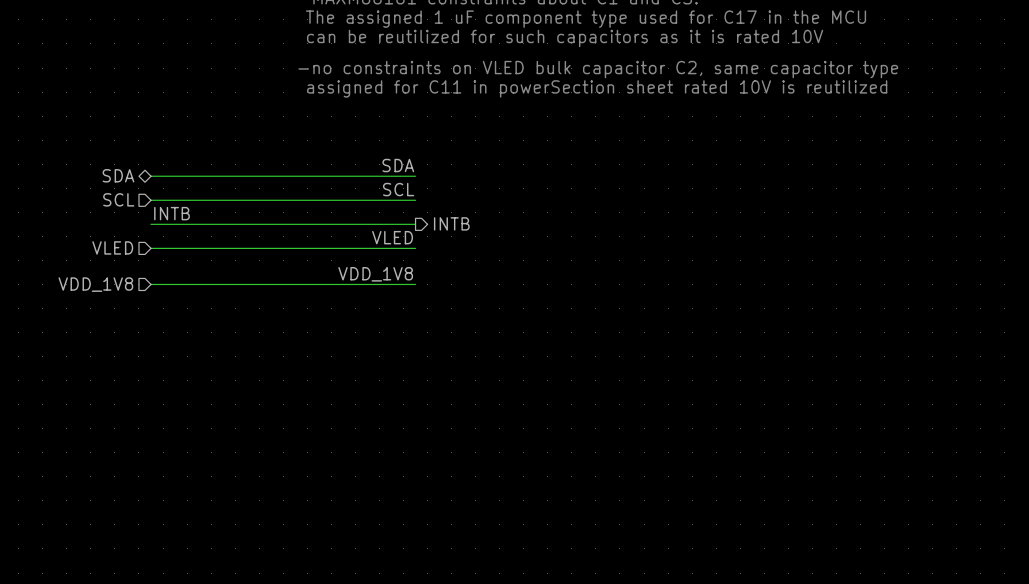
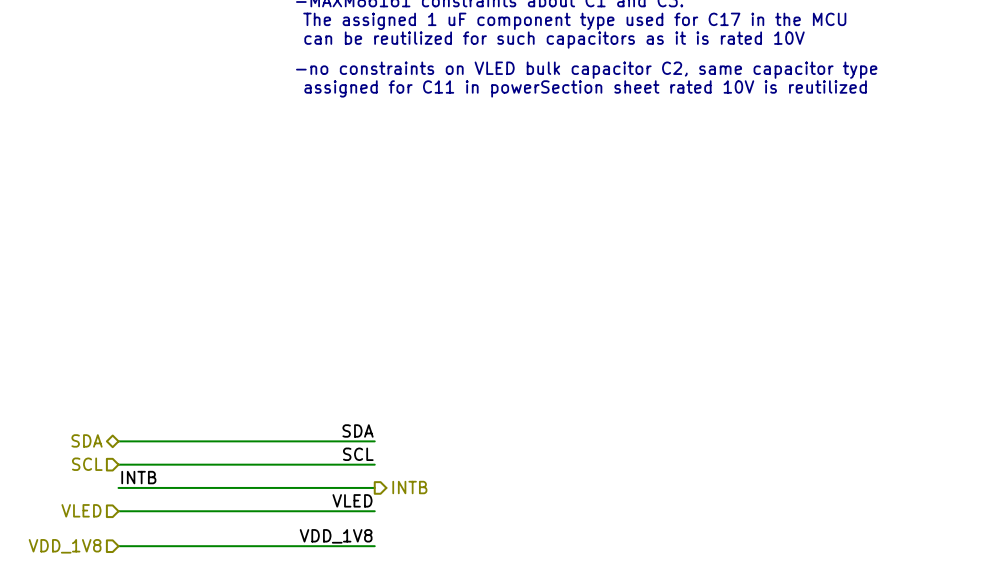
label: SDA (398, 165) -> none
hierarchical label: SDA (118, 175) -> none
wire: (151, 176) (415, 176) -> none
label: SCL (398, 189) -> none
hierarchical label: SCL (118, 199) -> none
wire: (151, 200) (415, 200) -> none
label: INTB (172, 213) -> none
hierarchical label: INTB (451, 223) -> none
wire: (151, 224) (415, 224) -> (118, 441) (374, 441)
label: VLED (392, 237) -> none
hierarchical label: VLED (112, 247) -> none
wire: (151, 248) (415, 248) -> (118, 464) (374, 464)
label: VDD_1V8 (375, 274) -> none
hierarchical label: VDD_1V8 (95, 284) -> none
wire: (151, 284) (415, 284) -> (118, 487) (374, 487)
label: none -> SDA (358, 430)
hierarchical label: none -> SDA (87, 440)
label: none -> SCL (358, 454)
hierarchical label: none -> SCL (87, 464)
label: none -> INTB (138, 477)
hierarchical label: none -> INTB (409, 487)
label: none -> VLED (352, 500)
hierarchical label: none -> VLED (81, 510)
wire: none -> (118, 511) (374, 511)
label: none -> VDD_1V8 (336, 536)
hierarchical label: none -> VDD_1V8 (65, 546)
wire: none -> (118, 546) (374, 546)

